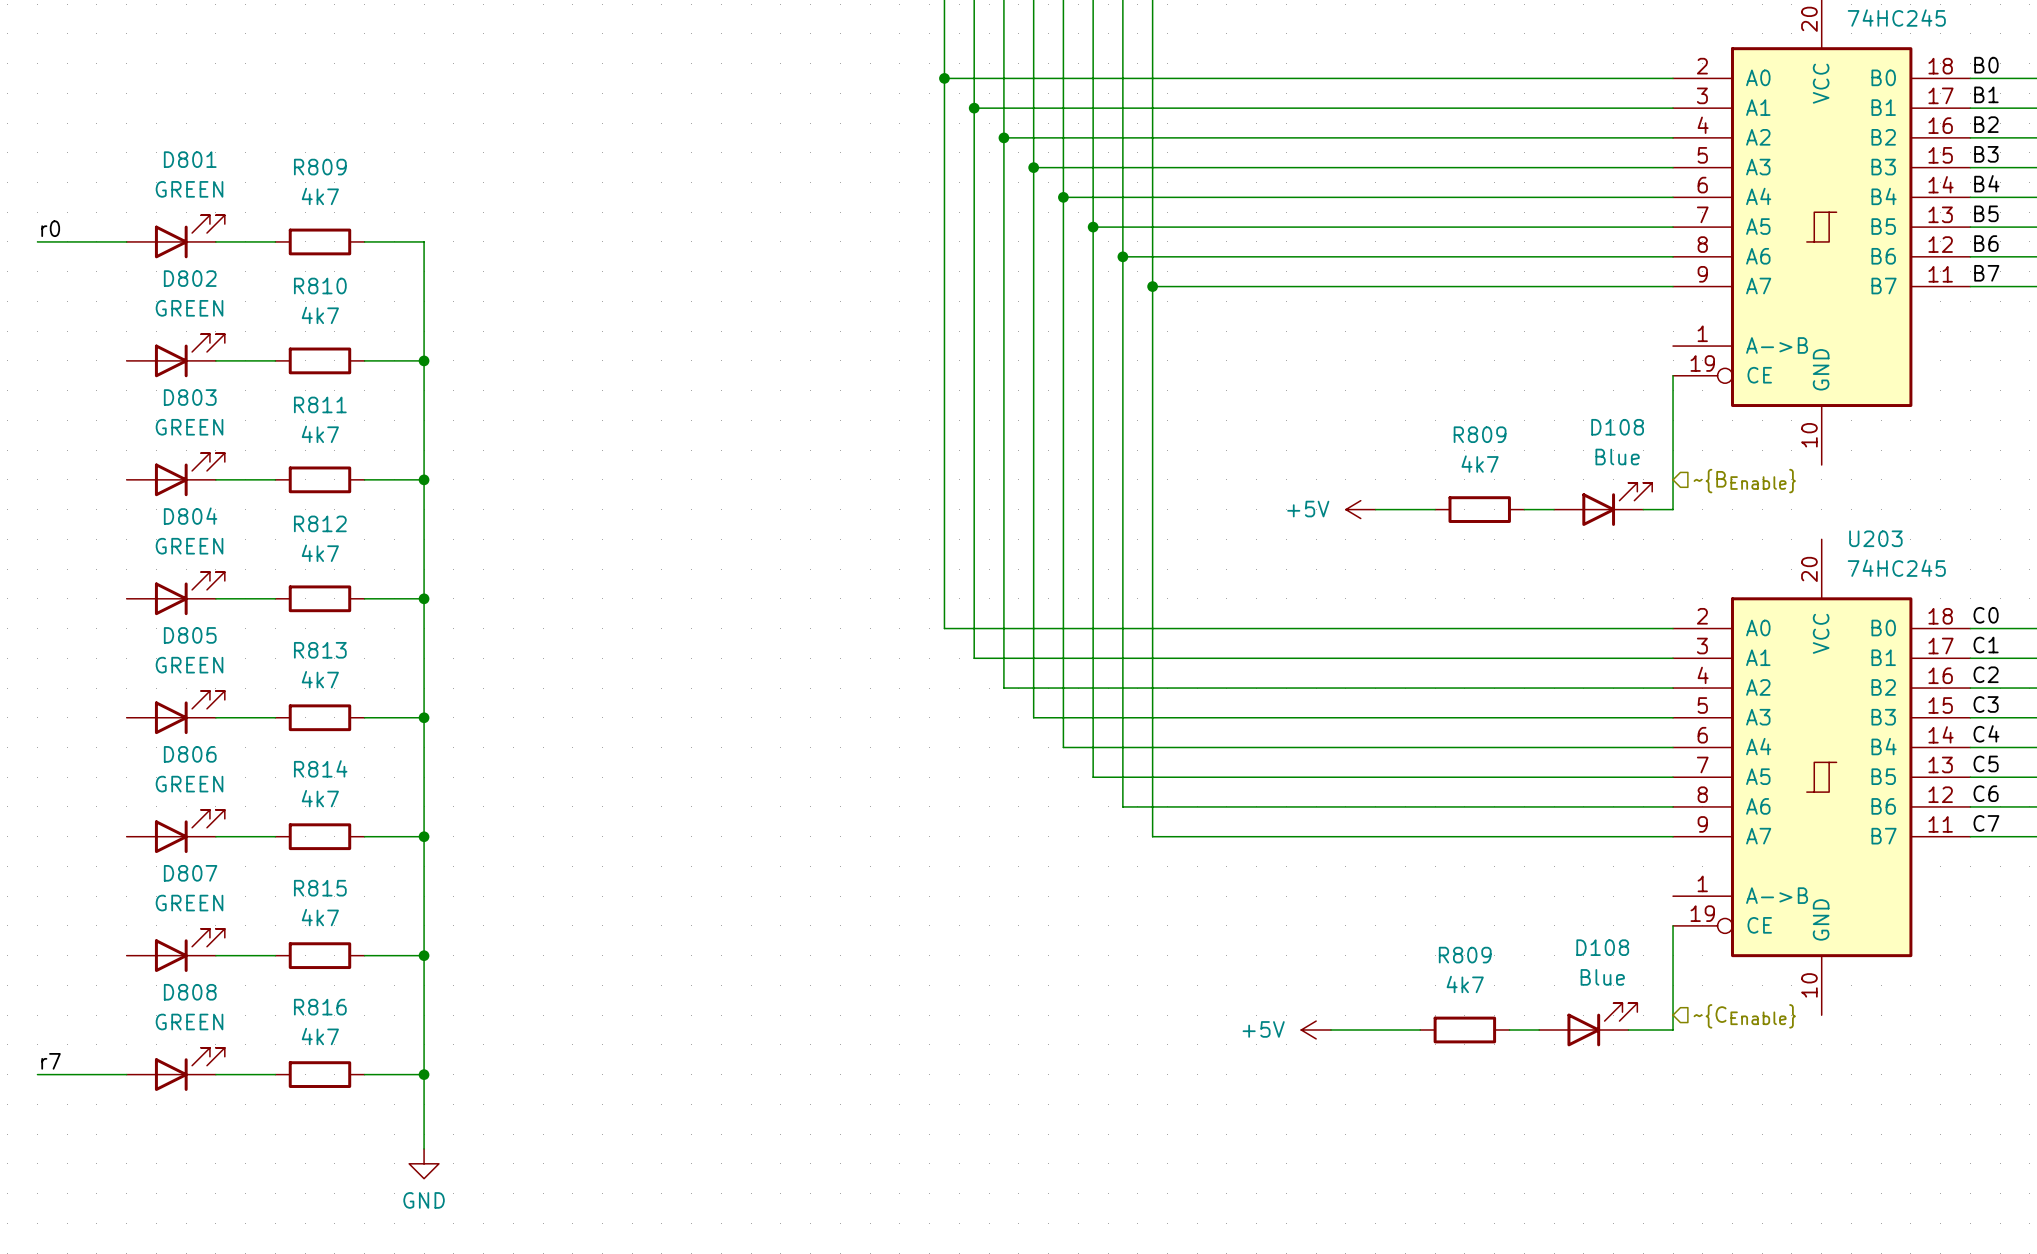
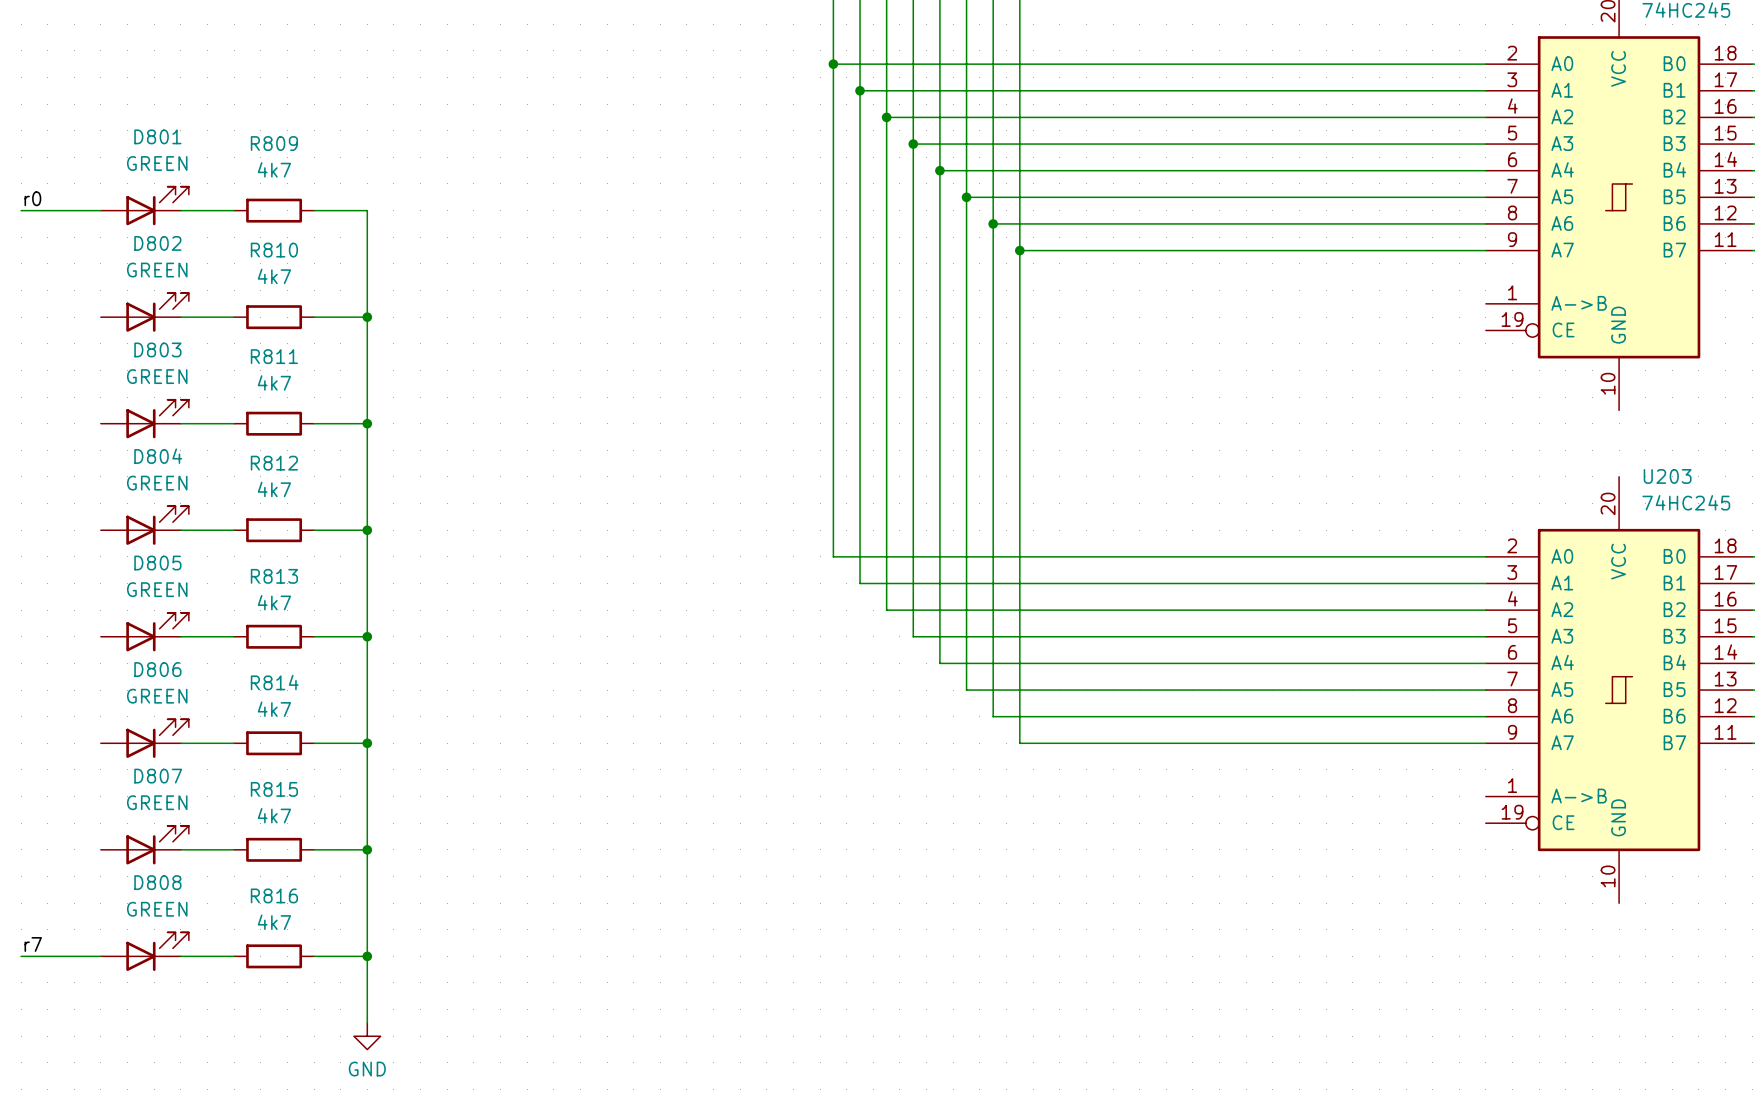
wire: (1673, 375) (1673, 509) (1643, 509) -> none
hierarchical label: ~{BEnable} (1744, 481) -> none
D108: Blue (1603, 504) -> none
power symbol: +5V (1360, 509) -> none
wire: (1375, 509) (1435, 509) -> none
R809: 4k7 (1479, 509) -> none
wire: (1524, 509) (1554, 509) -> none
wire: (1673, 925) (1673, 1029) (1628, 1029) -> none
hierarchical label: ~{CEnable} (1744, 1016) -> none
D108: Blue (1588, 1024) -> none
power symbol: +5V (1316, 1029) -> none
wire: (1331, 1029) (1420, 1029) -> none
R809: 4k7 (1464, 1029) -> none
wire: (1509, 1029) (1539, 1029) -> none

